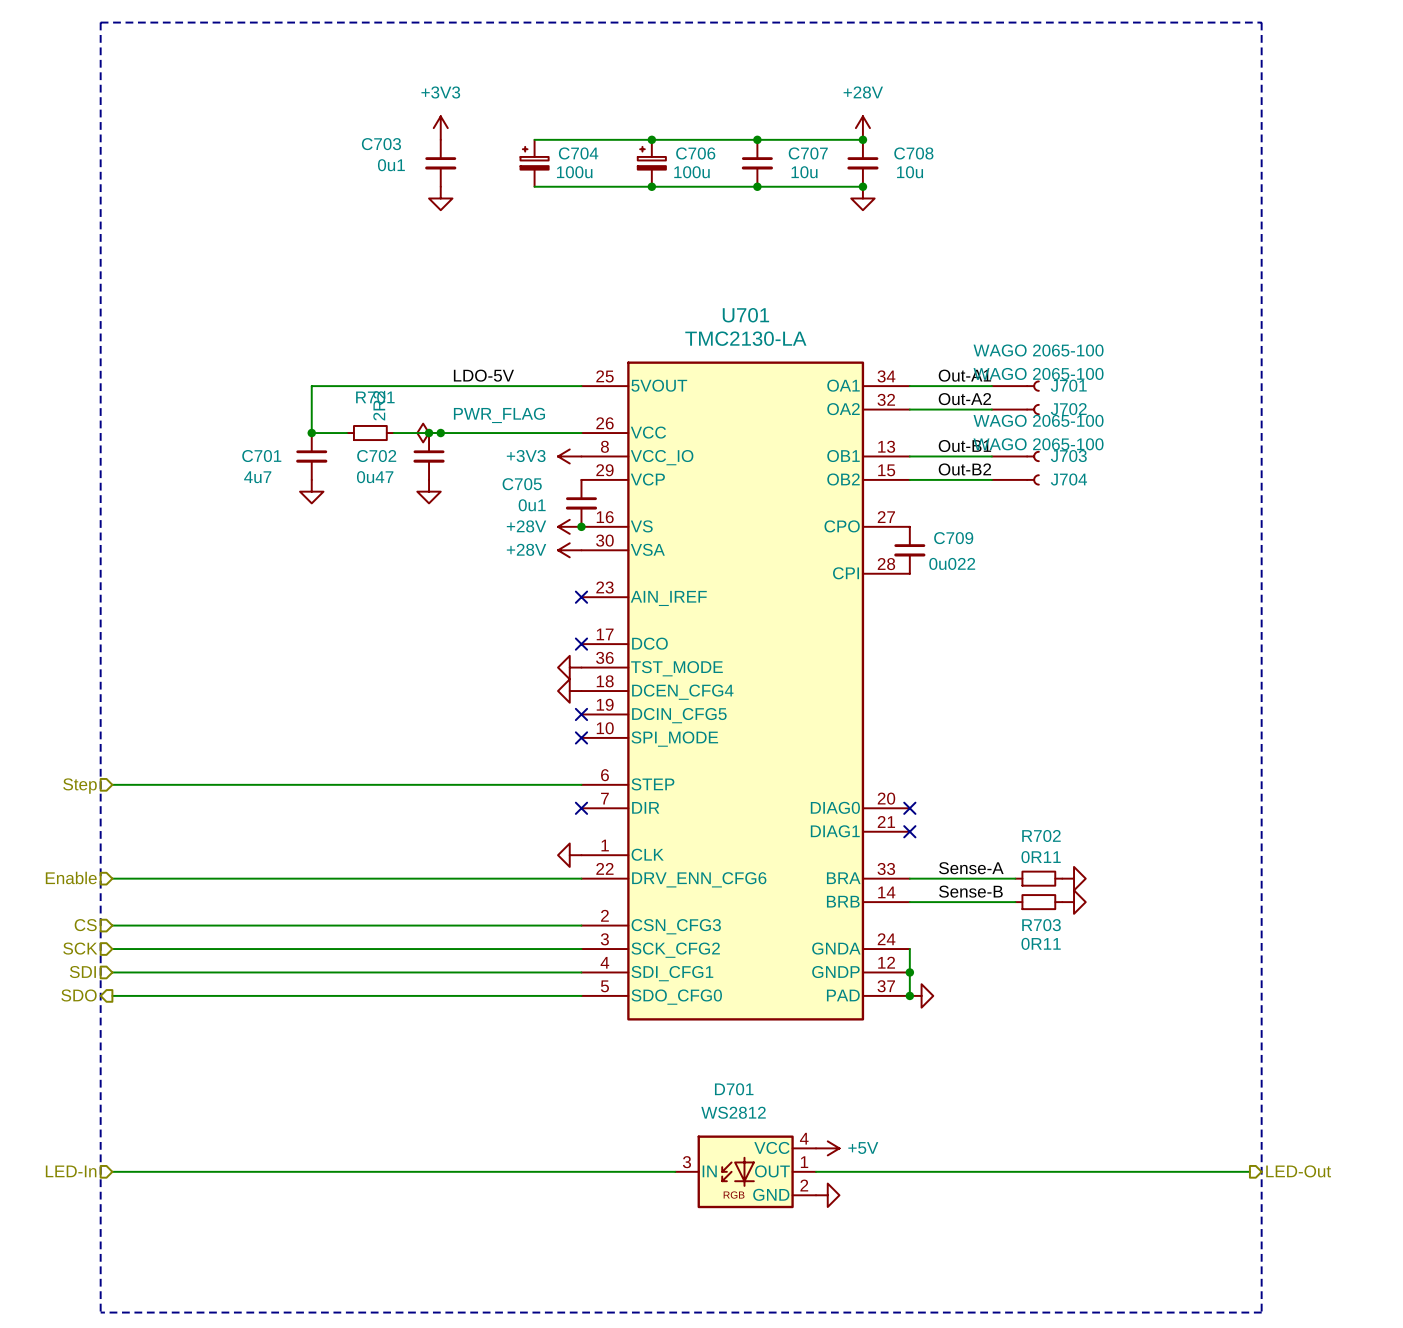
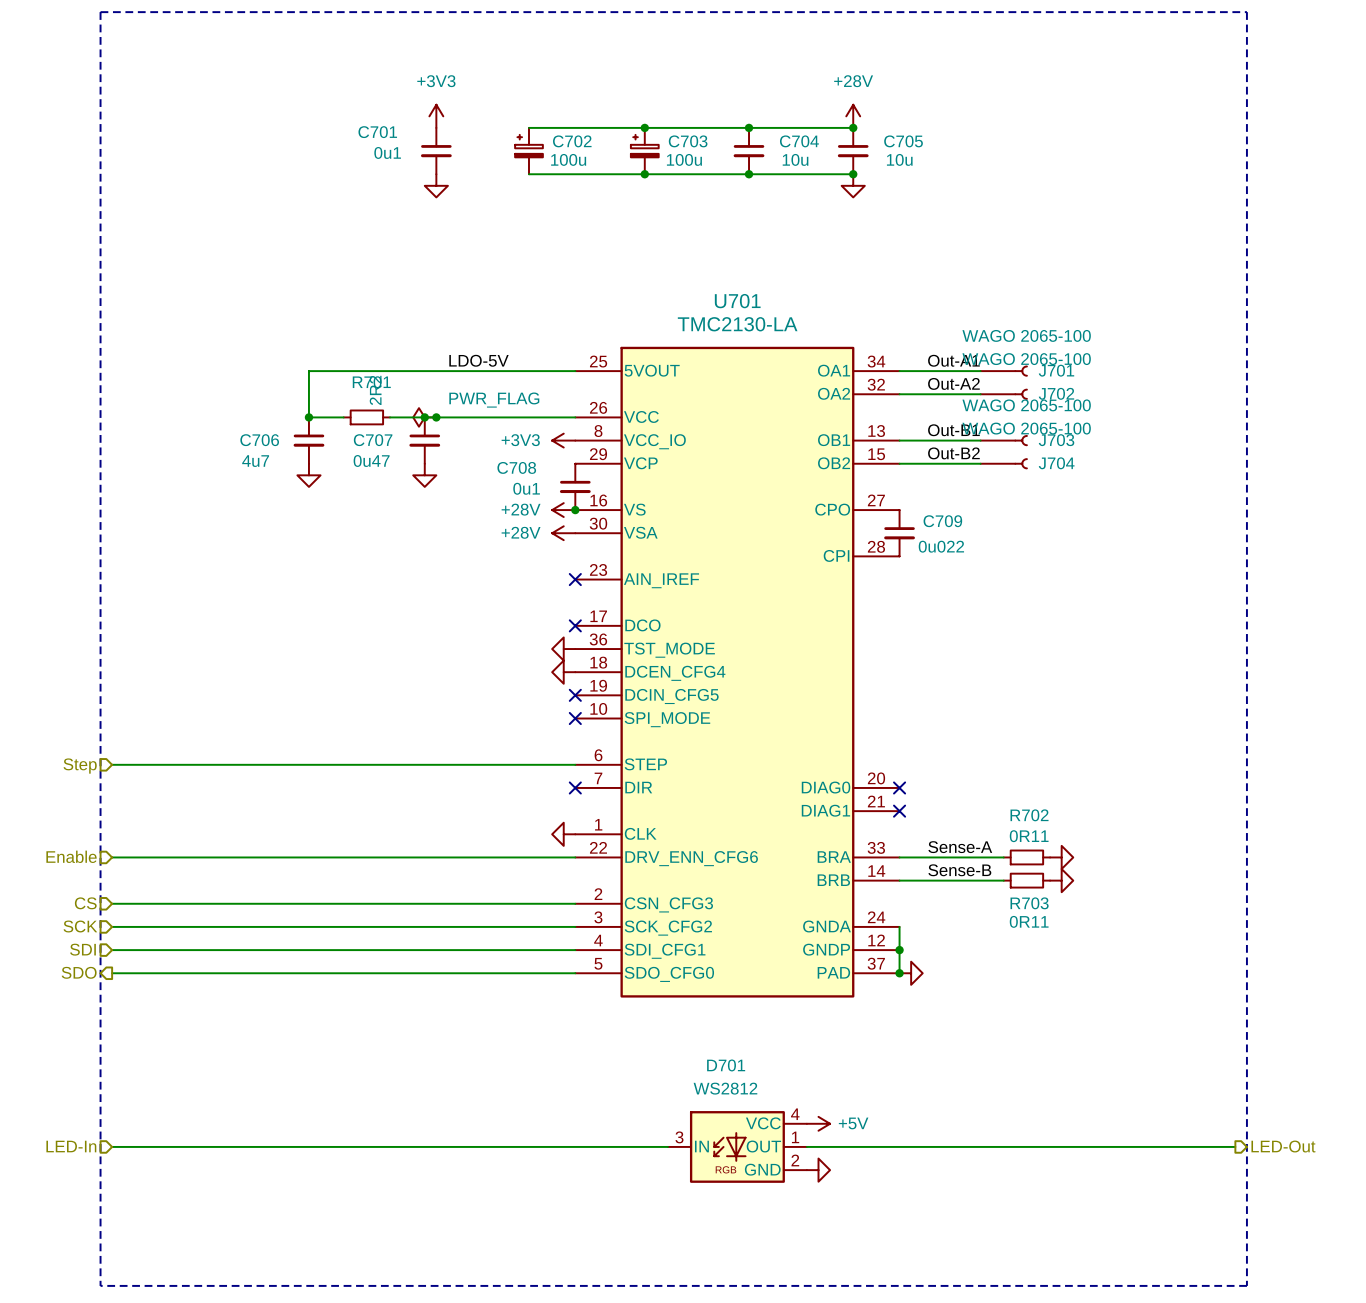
C703 name: C703 (381, 144) -> C701 (377, 132)
C704 name: C704 (578, 153) -> C702 (572, 141)
C706 name: C706 (695, 153) -> C703 (688, 141)
C707 name: C707 (808, 153) -> C704 (799, 141)
C708 name: C708 (913, 153) -> C705 (903, 141)
C701 name: C701 (261, 456) -> C706 (259, 440)
C702 name: C702 (376, 456) -> C707 (373, 440)
C705 name: C705 (522, 484) -> C708 (516, 467)

